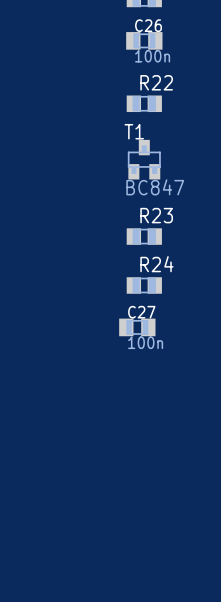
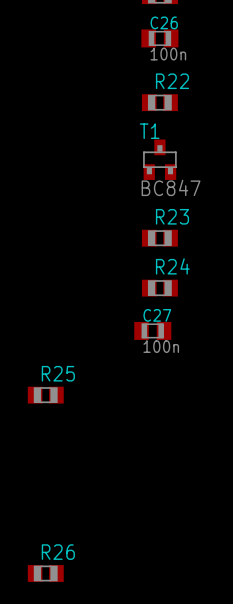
R25: none -> (45, 395)
R26: none -> (45, 573)

